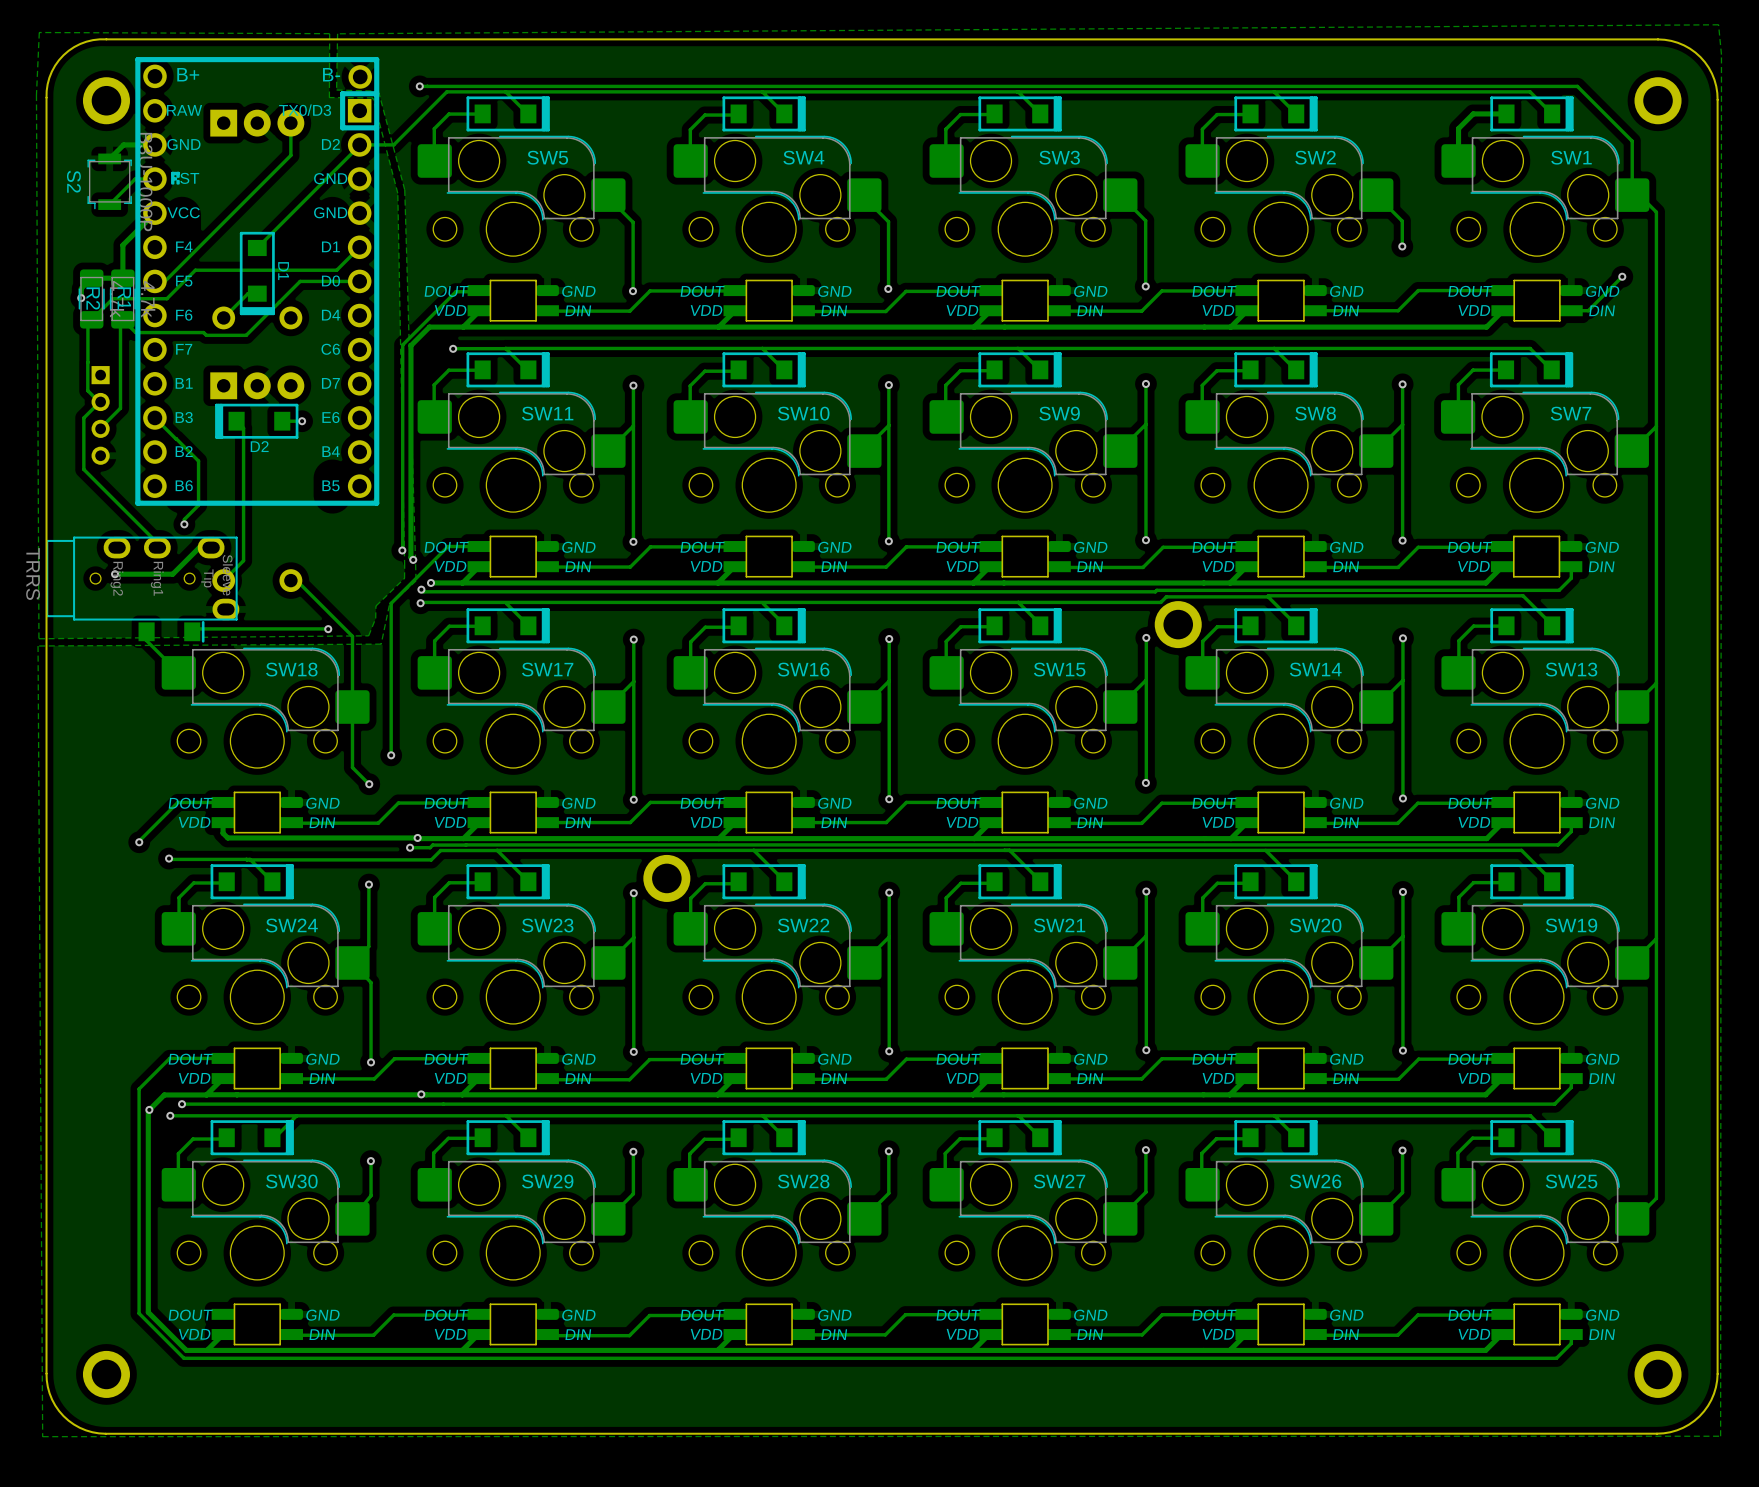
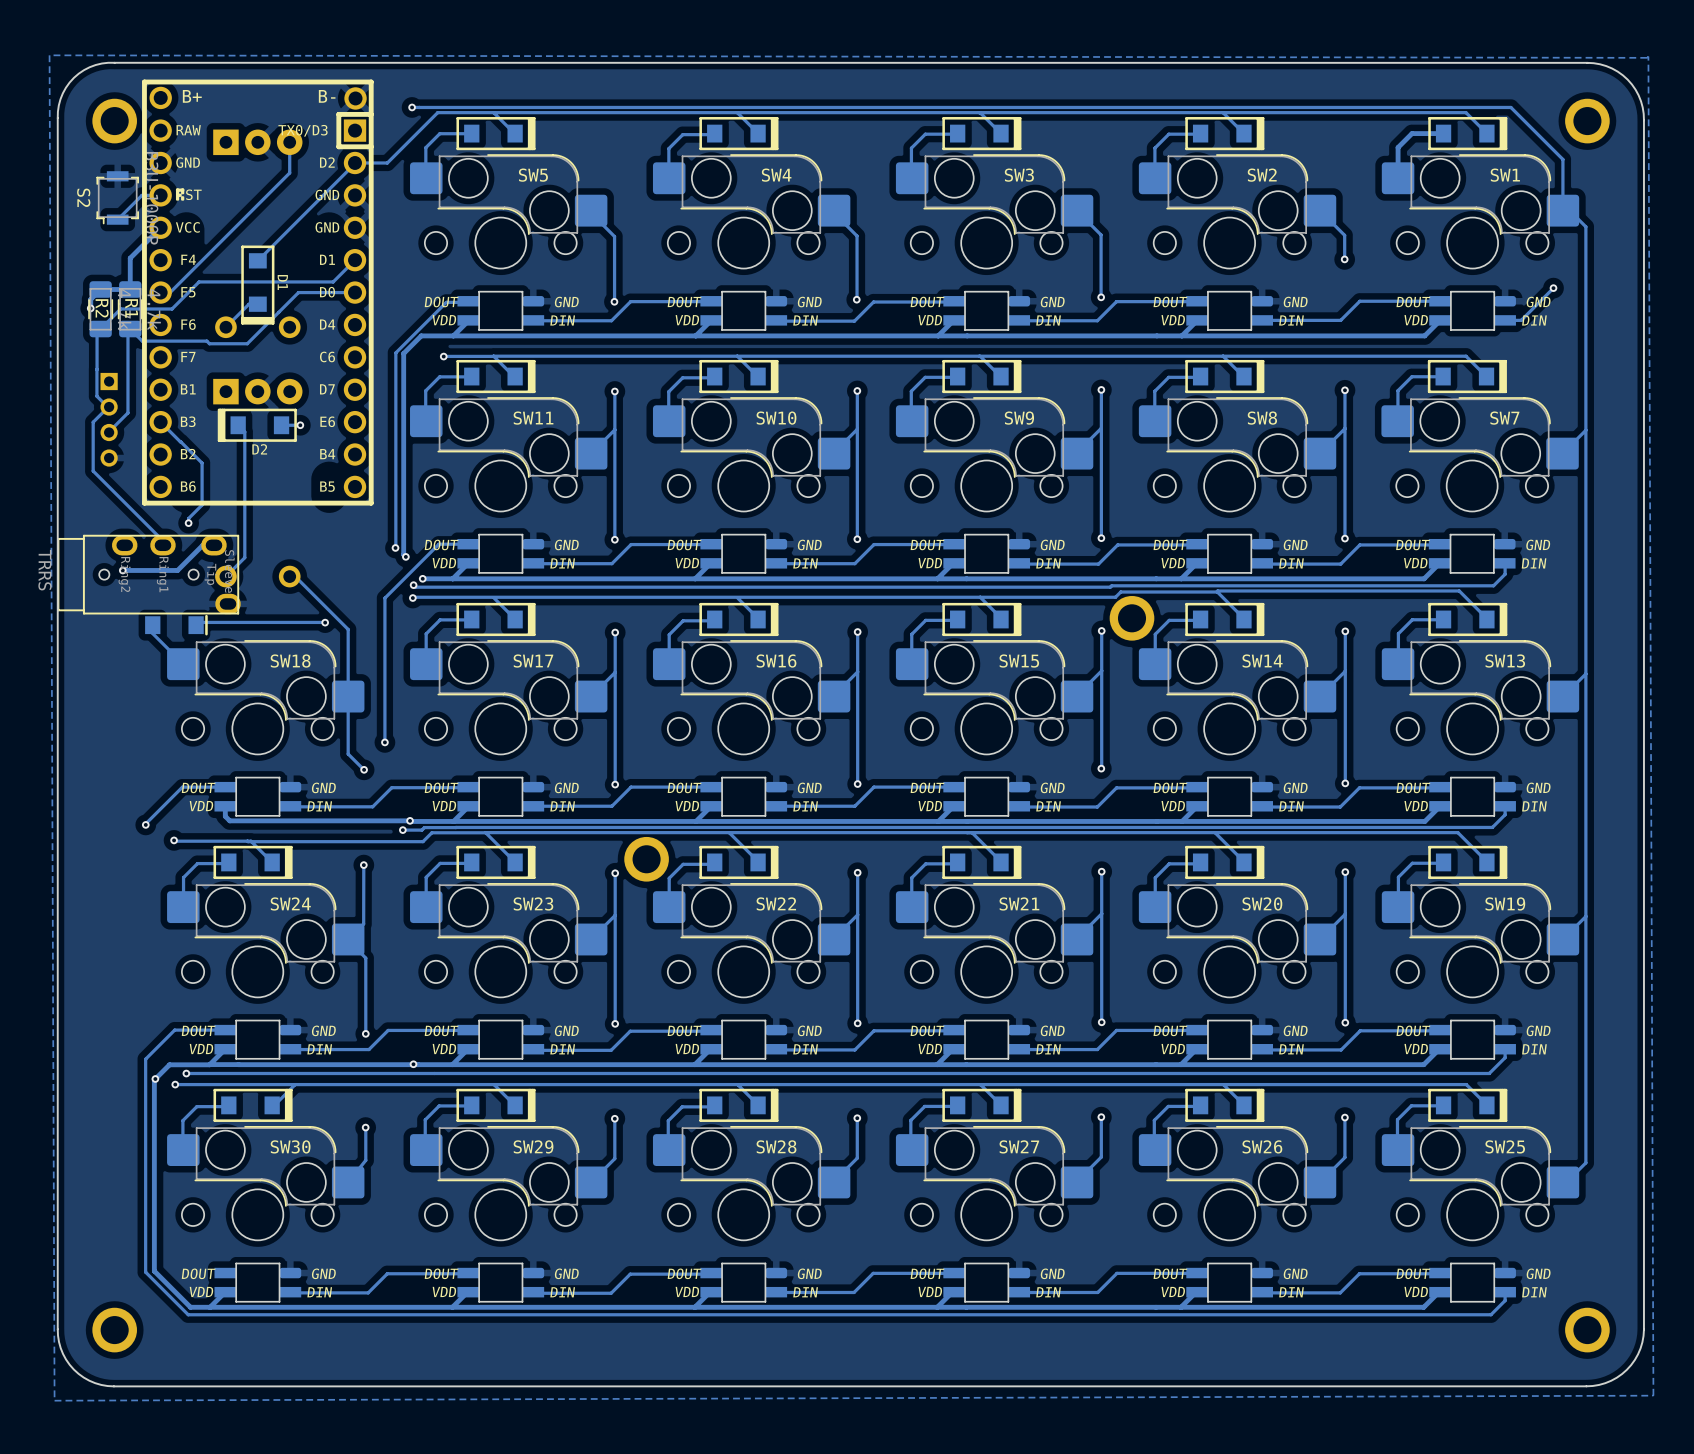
zone outline: (1718, 24) (1721, 54) (1720, 1436) (42, 1436) (38, 646) (381, 644) (389, 605) (416, 580) (404, 189) (378, 91) (336, 90) (337, 33) (1718, 24) -> (49, 55) (1648, 56) (1653, 1395) (54, 1400) (49, 55)
zone outline: (39, 32) (36, 94) (38, 638) (368, 635) (375, 618) (375, 606) (404, 578) (404, 565) (397, 193) (372, 97) (329, 97) (329, 33) (39, 32) -> none
track: (154, 144) (123, 144) (109, 158) -> none

